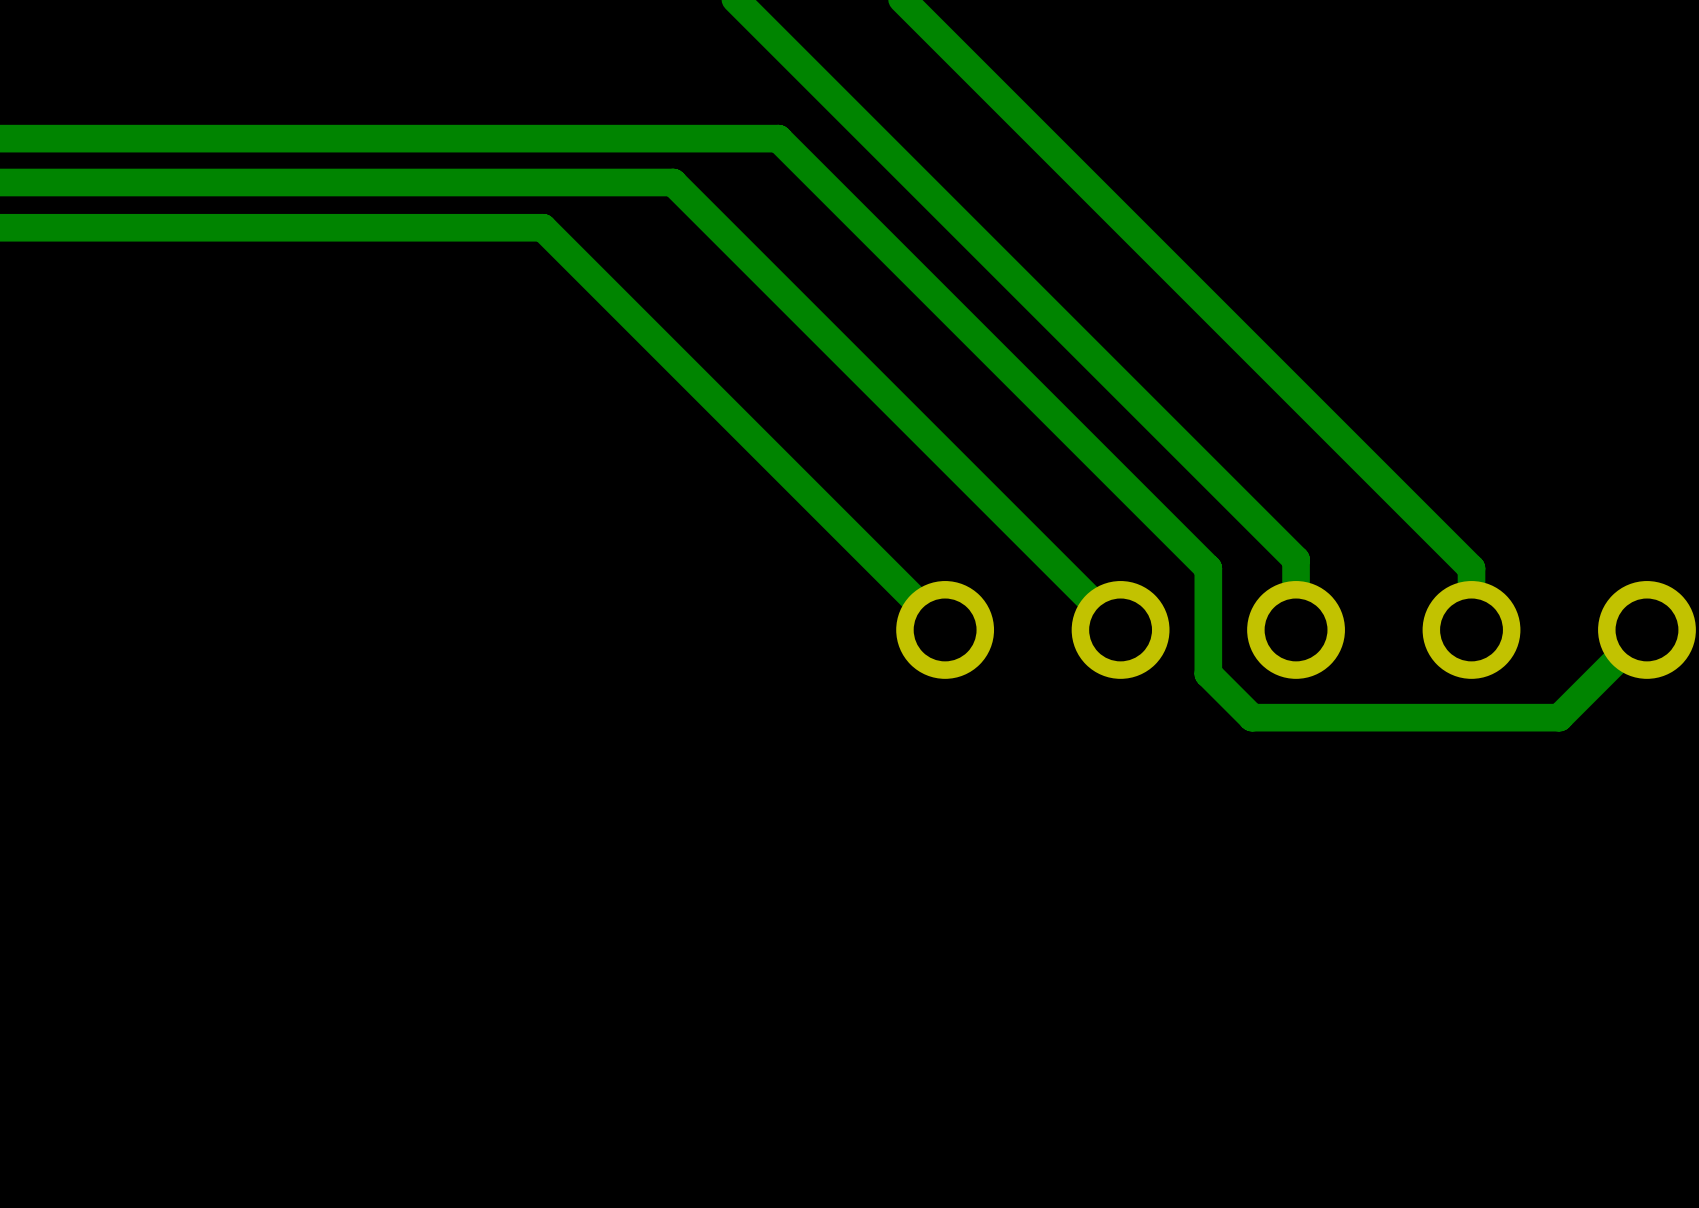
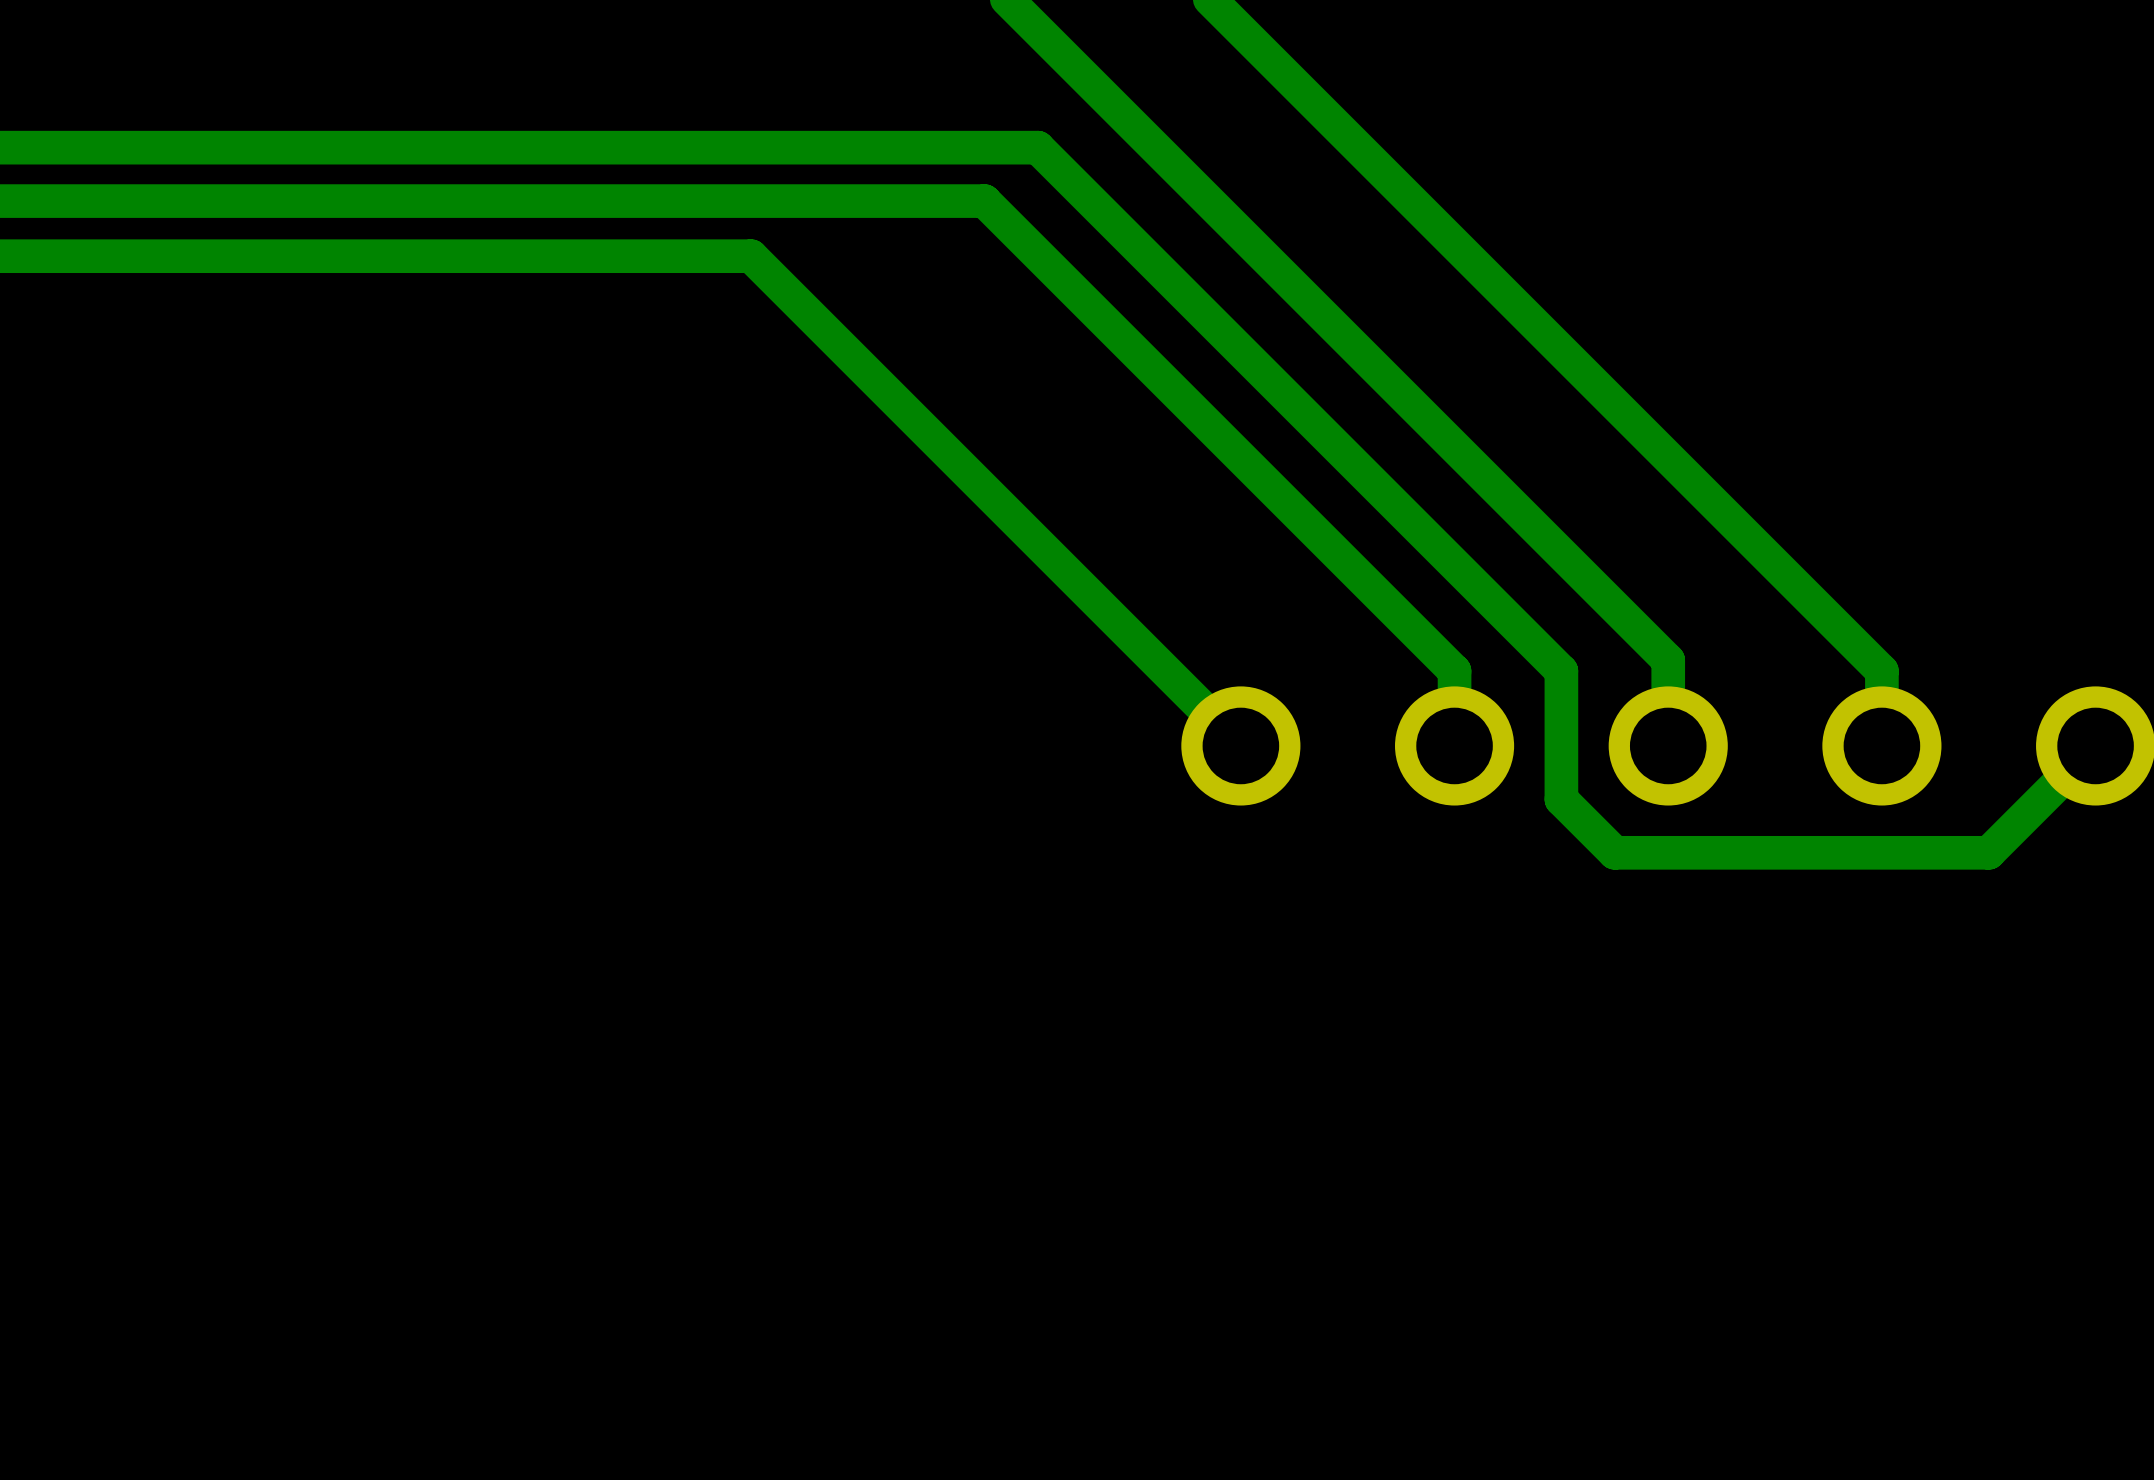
track: (673, 182) (1120, 629) -> (909, 201) (984, 201) (1454, 671) (1454, 745)

